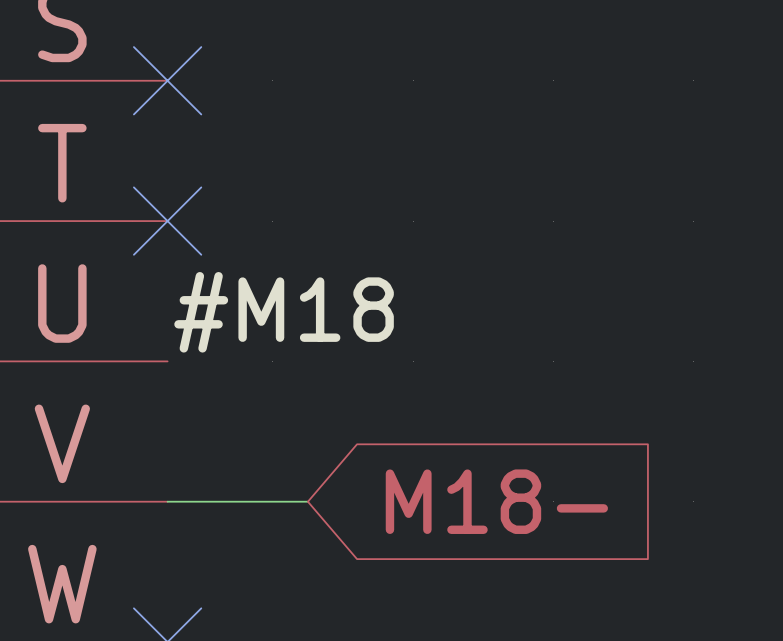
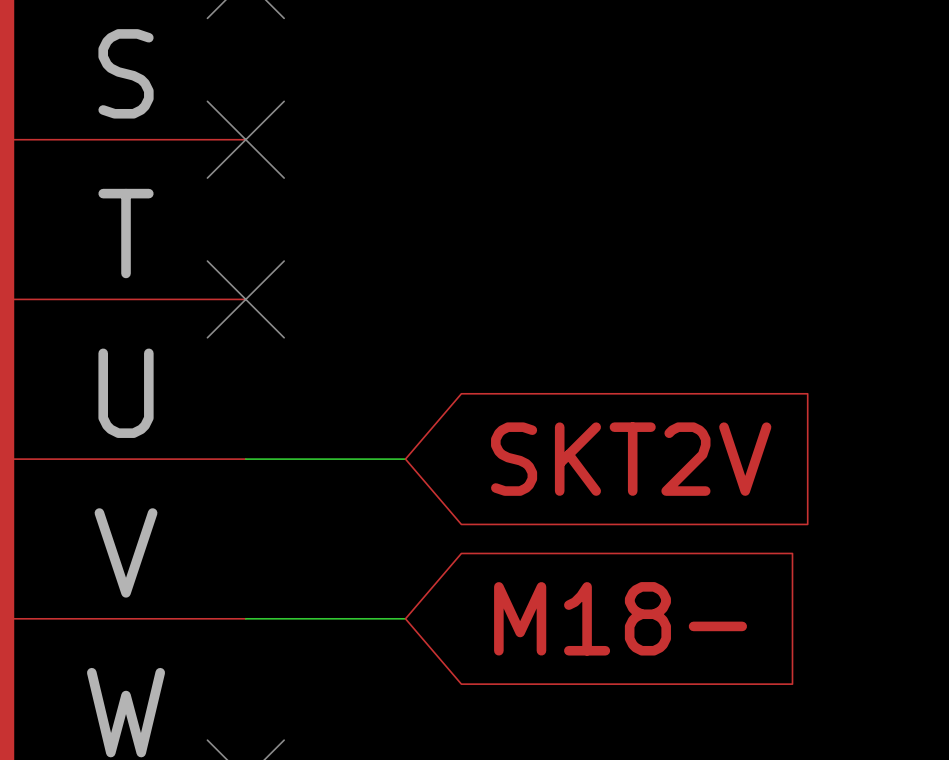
label: #M18 (284, 312) -> none
wire: none -> (245, 459) (405, 459)
global label: none -> SKT2V (631, 459)

